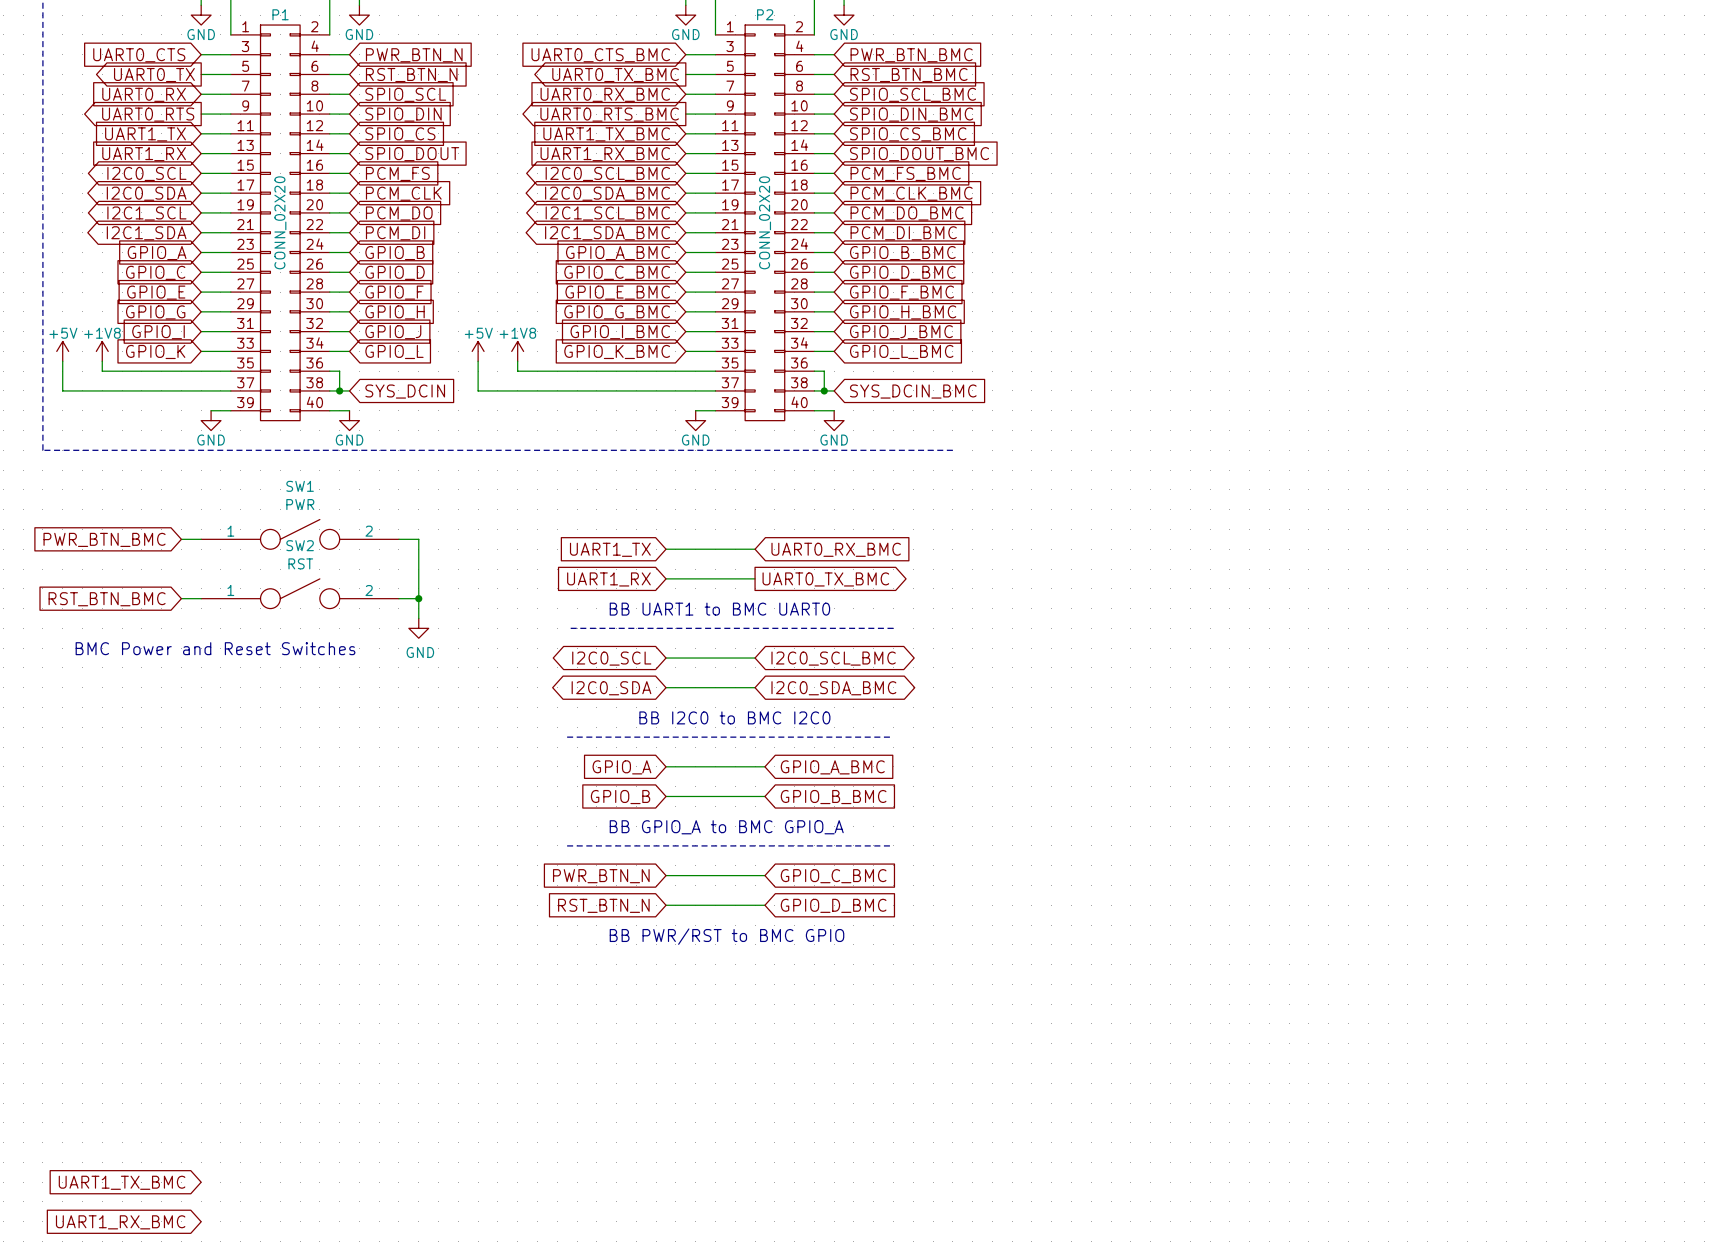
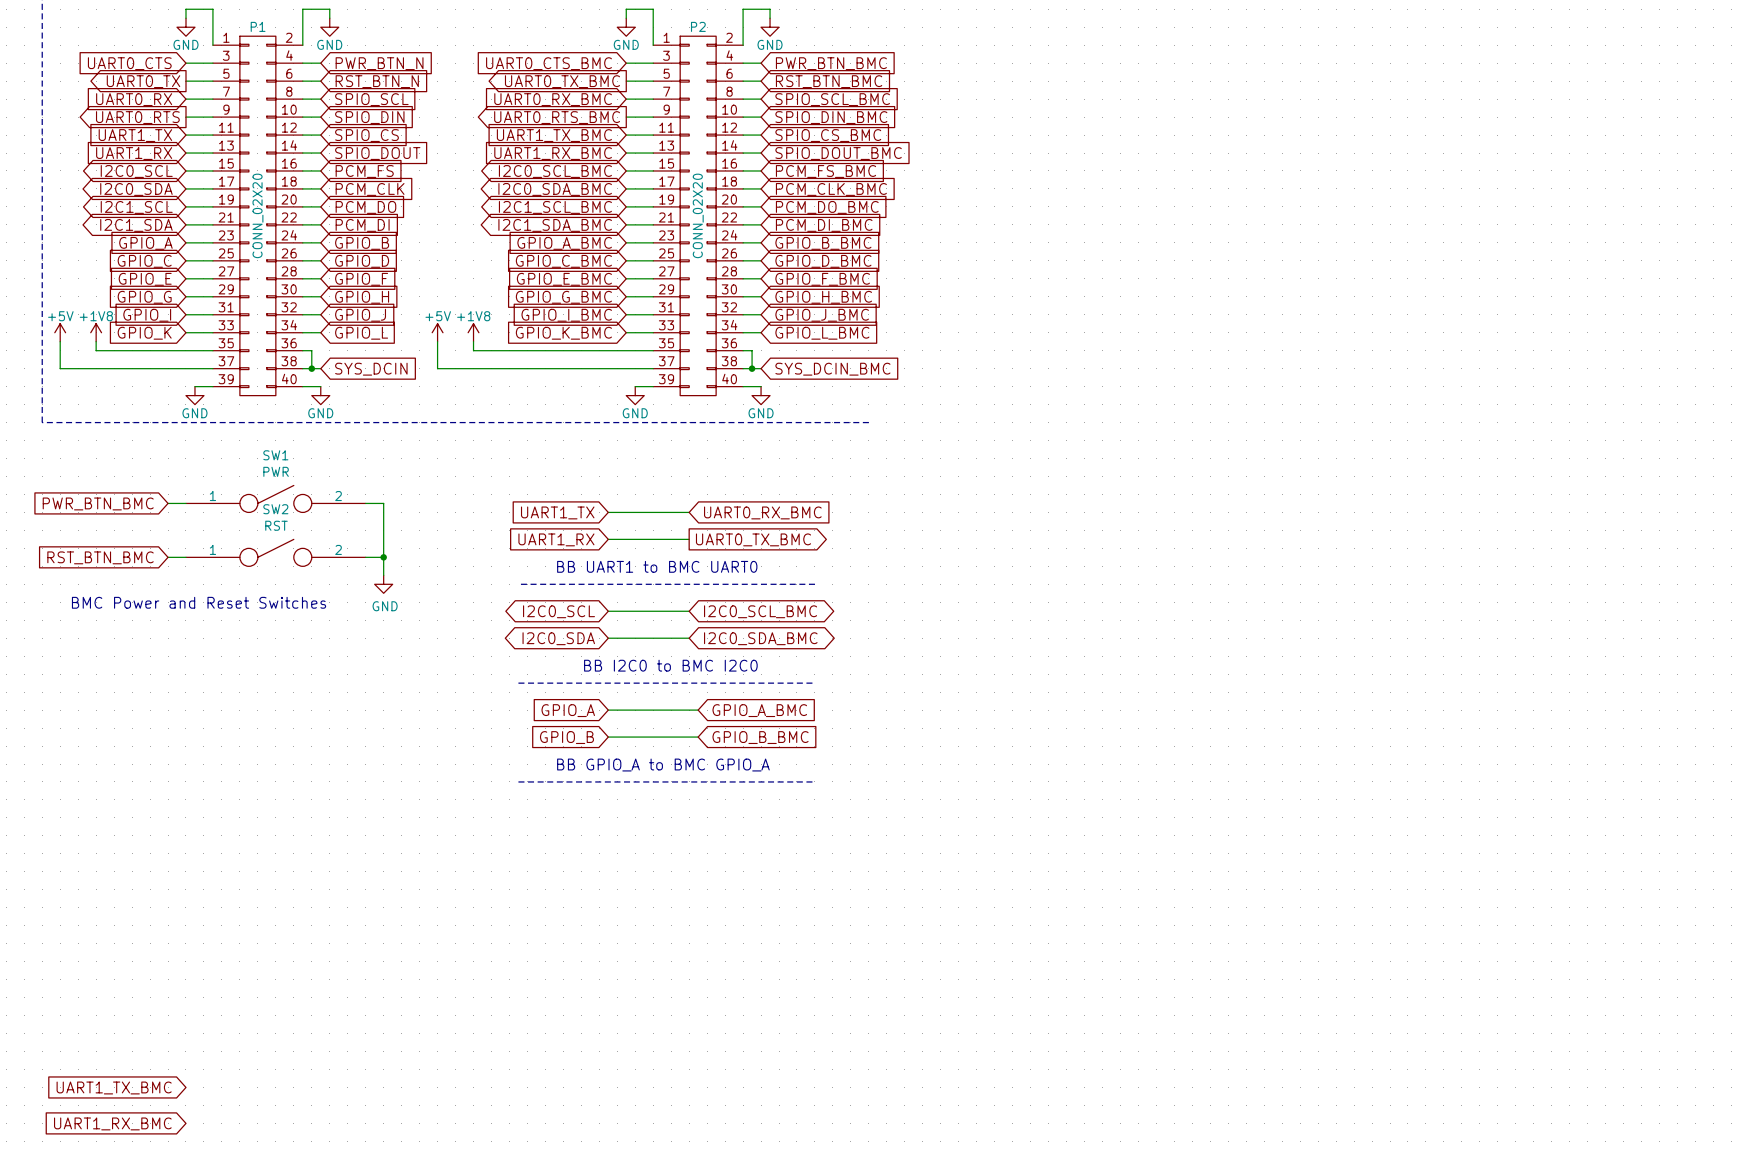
wire: (666, 875) (764, 875) -> none
global label: PWR_BTN_N (601, 876) -> none
global label: GPIO_C_BMC (833, 876) -> none
global label: RST_BTN_N (603, 905) -> none
wire: (666, 905) (764, 905) -> none
global label: GPIO_D_BMC (833, 905) -> none
text: BB PWR/RST to BMC GPIO (727, 936) -> none

